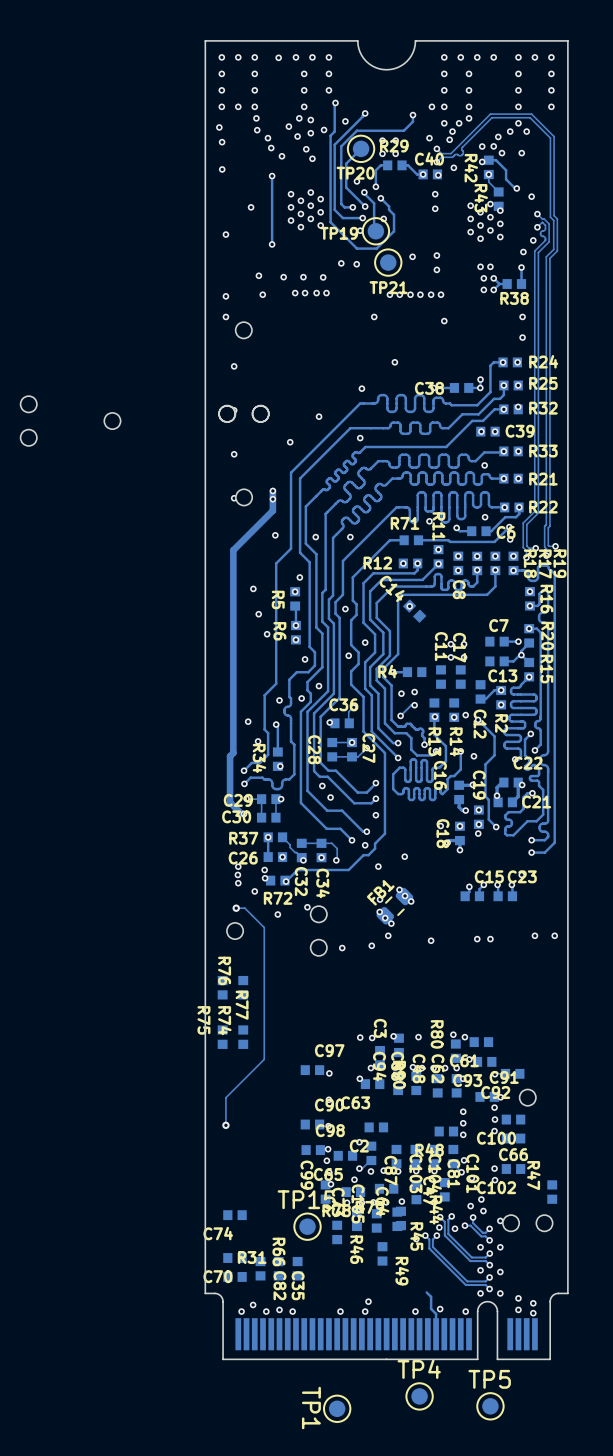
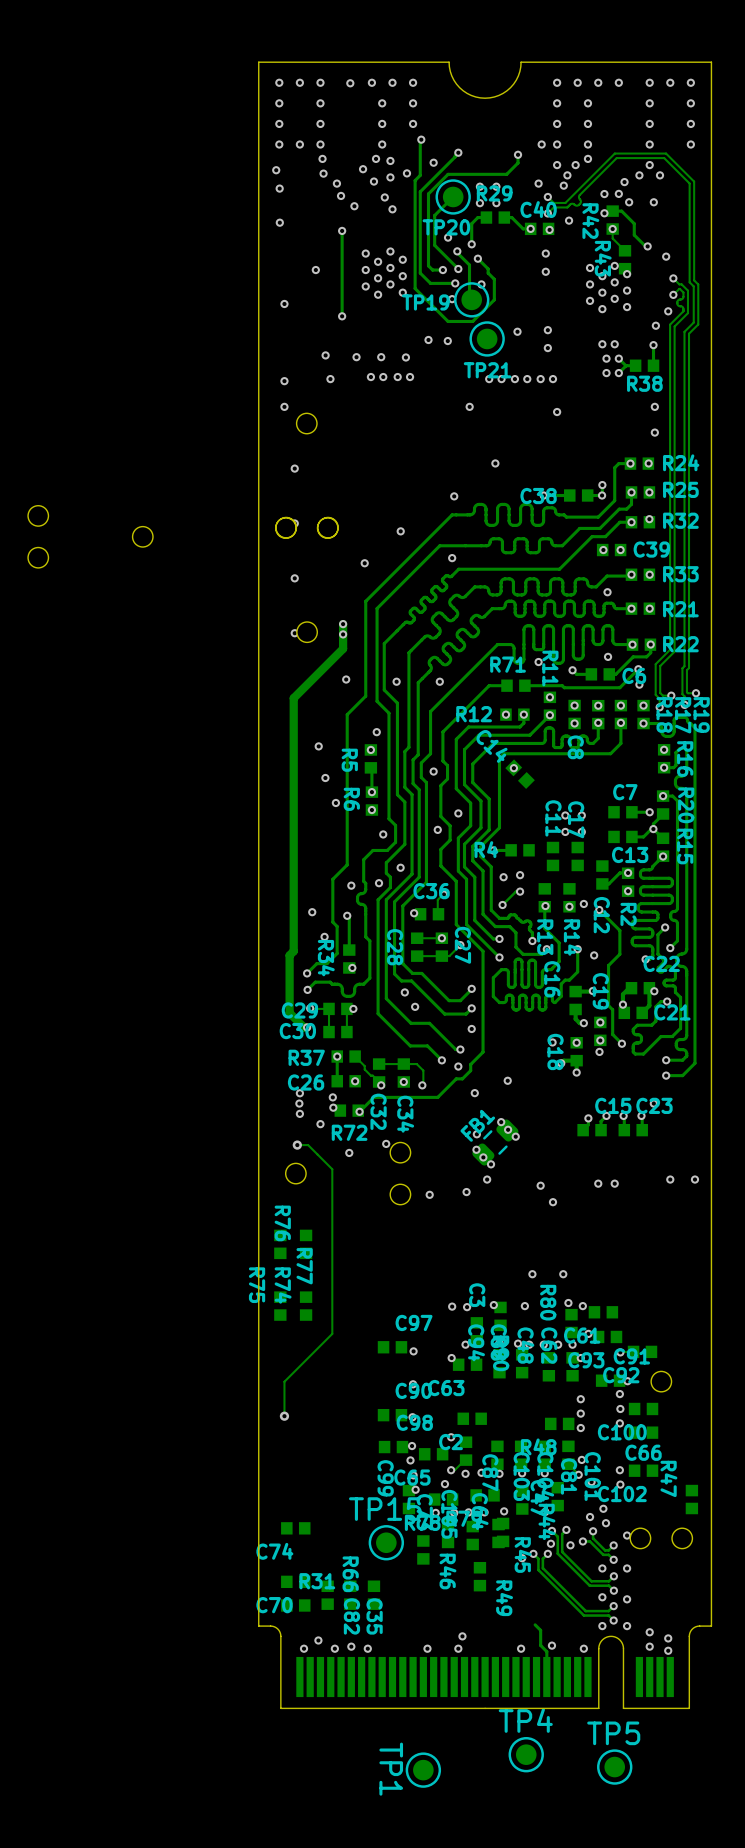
via: none -> (552, 1202)
via: none -> (532, 1274)
via: none -> (563, 1274)

